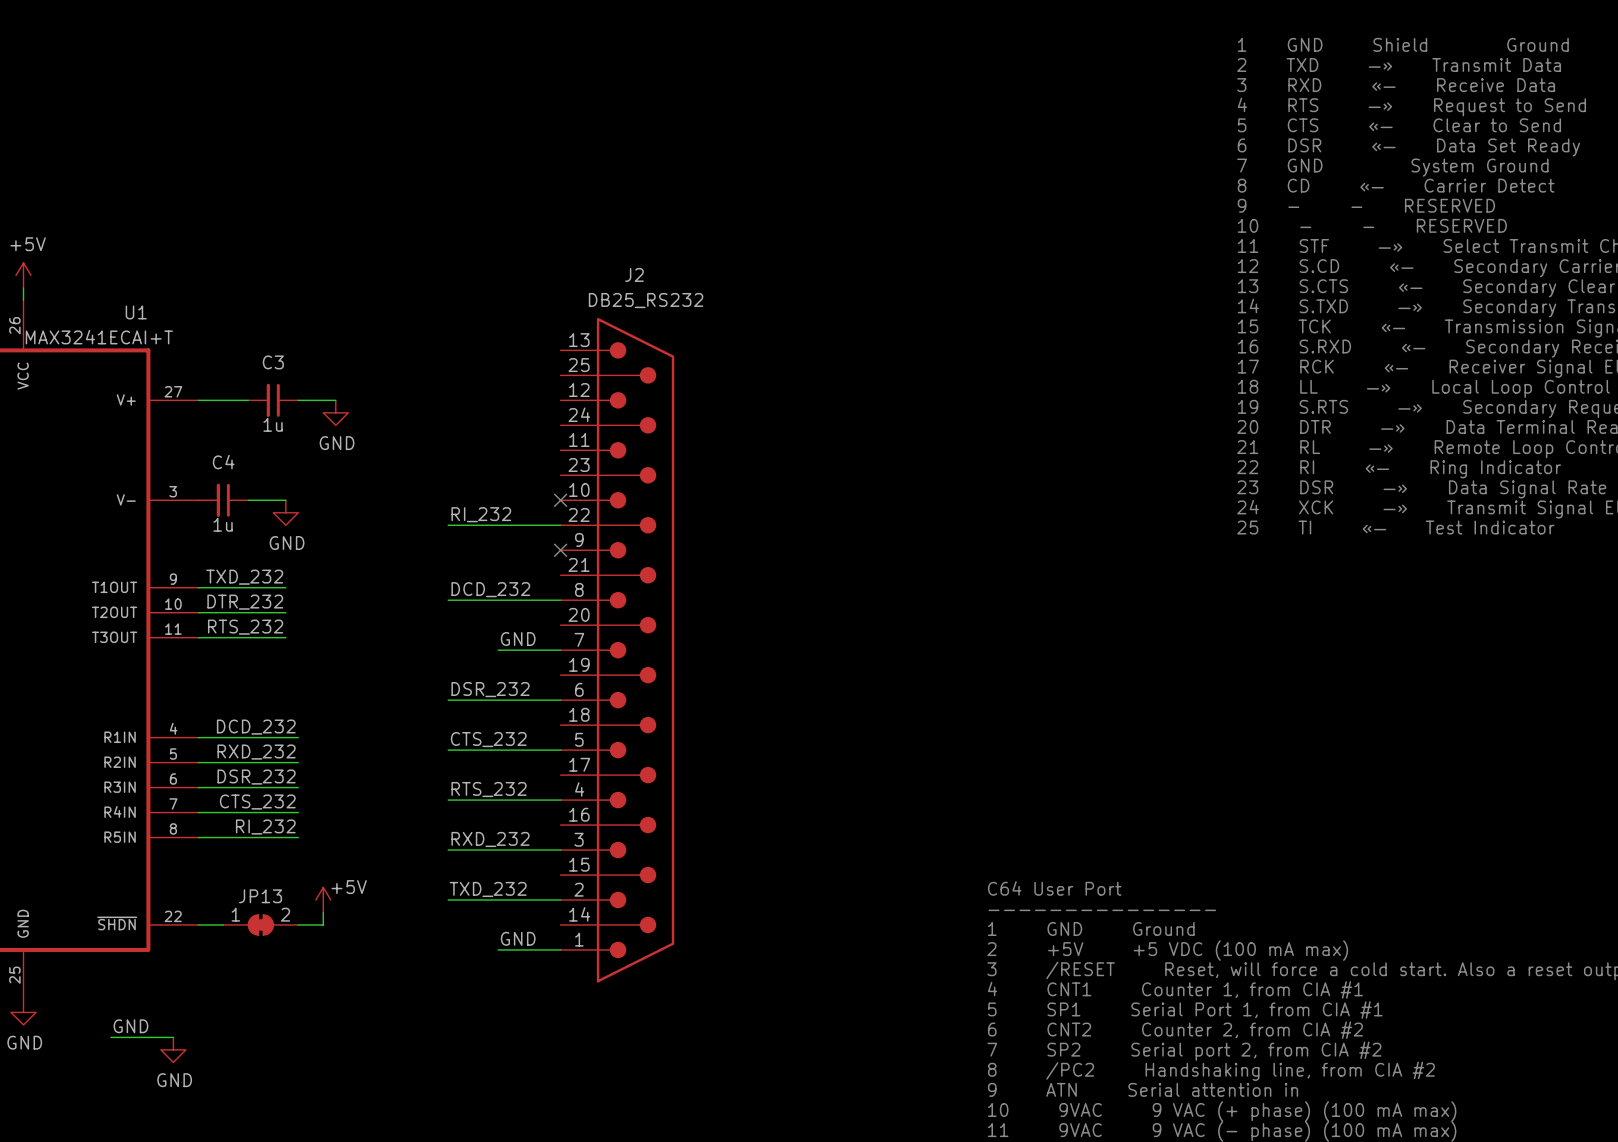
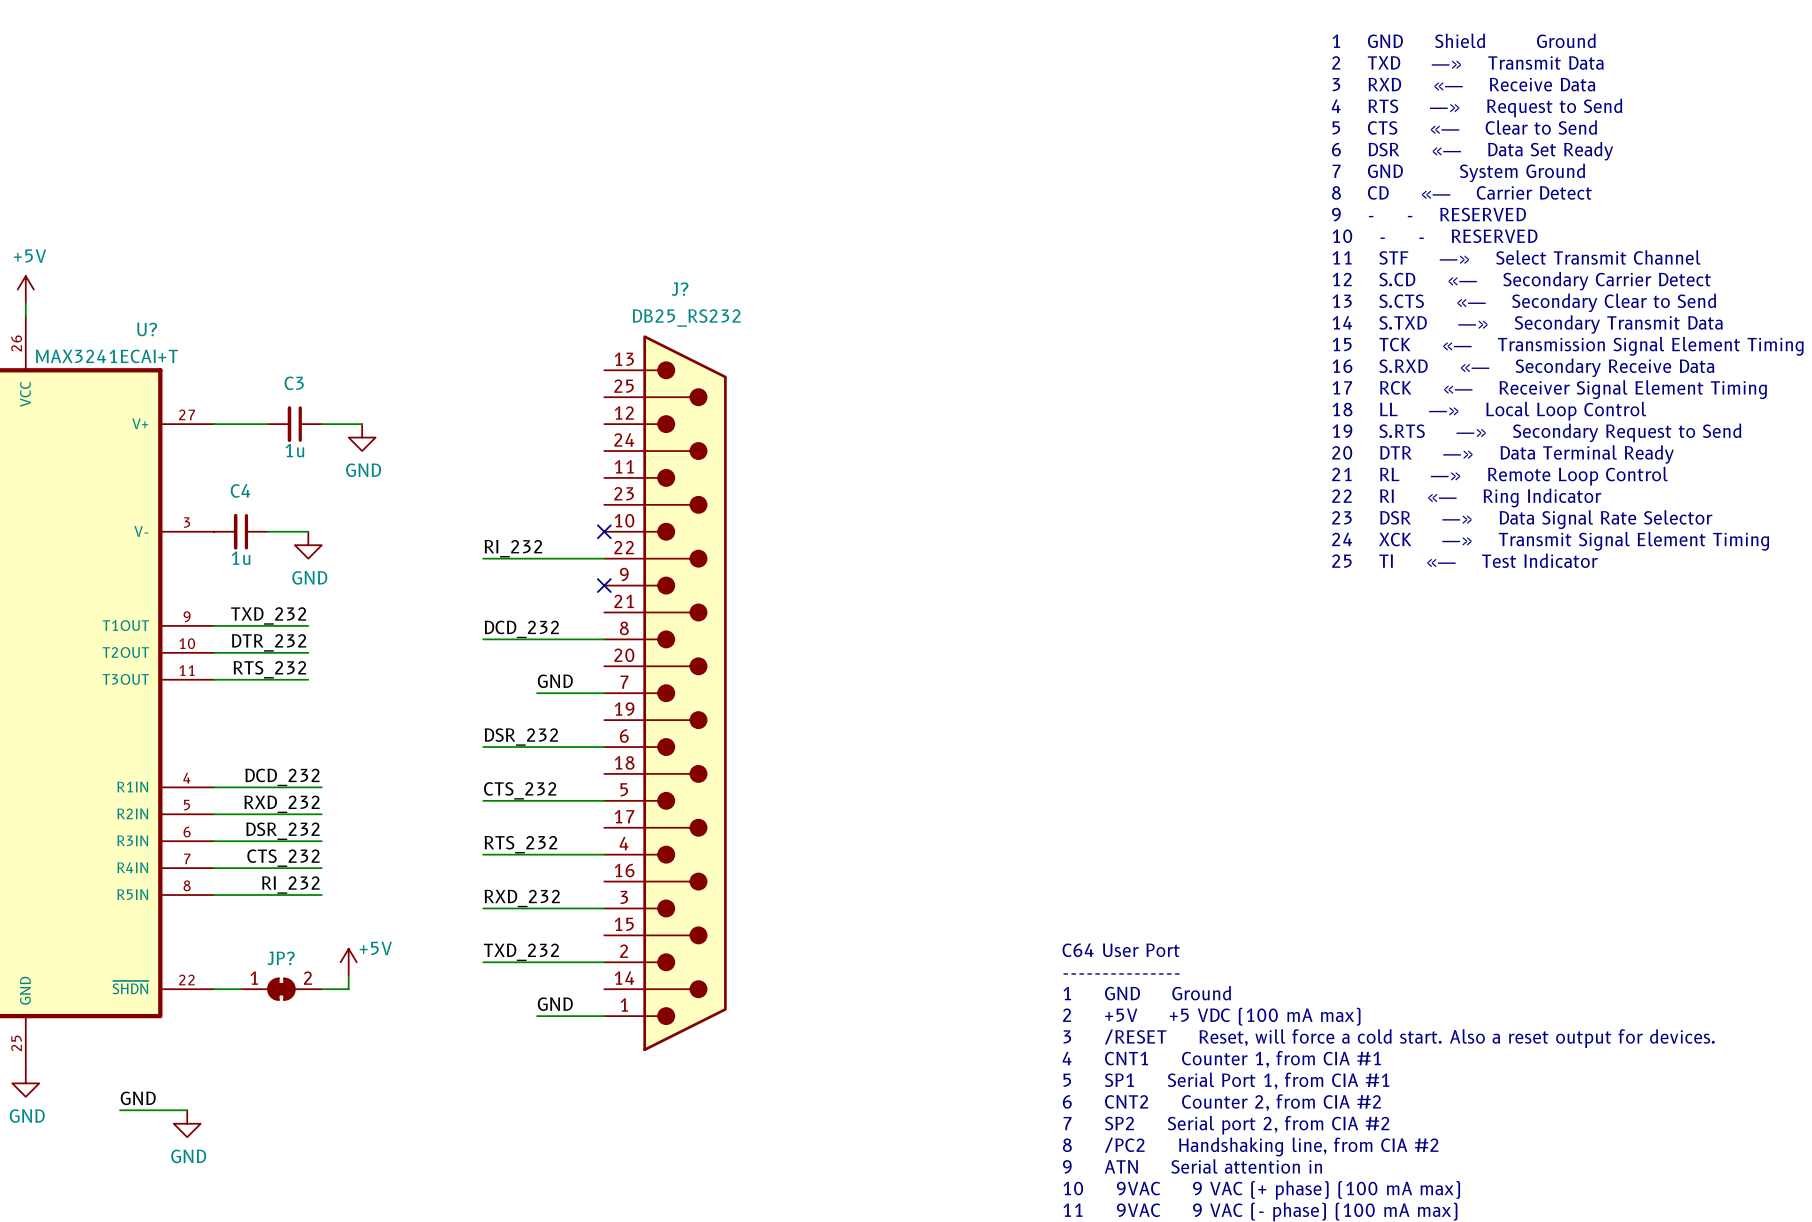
J2 name: J2 (634, 274) -> J? (680, 289)
U1 name: U1 (136, 312) -> U? (147, 329)
JP13 name: JP13 (260, 896) -> JP? (280, 958)

